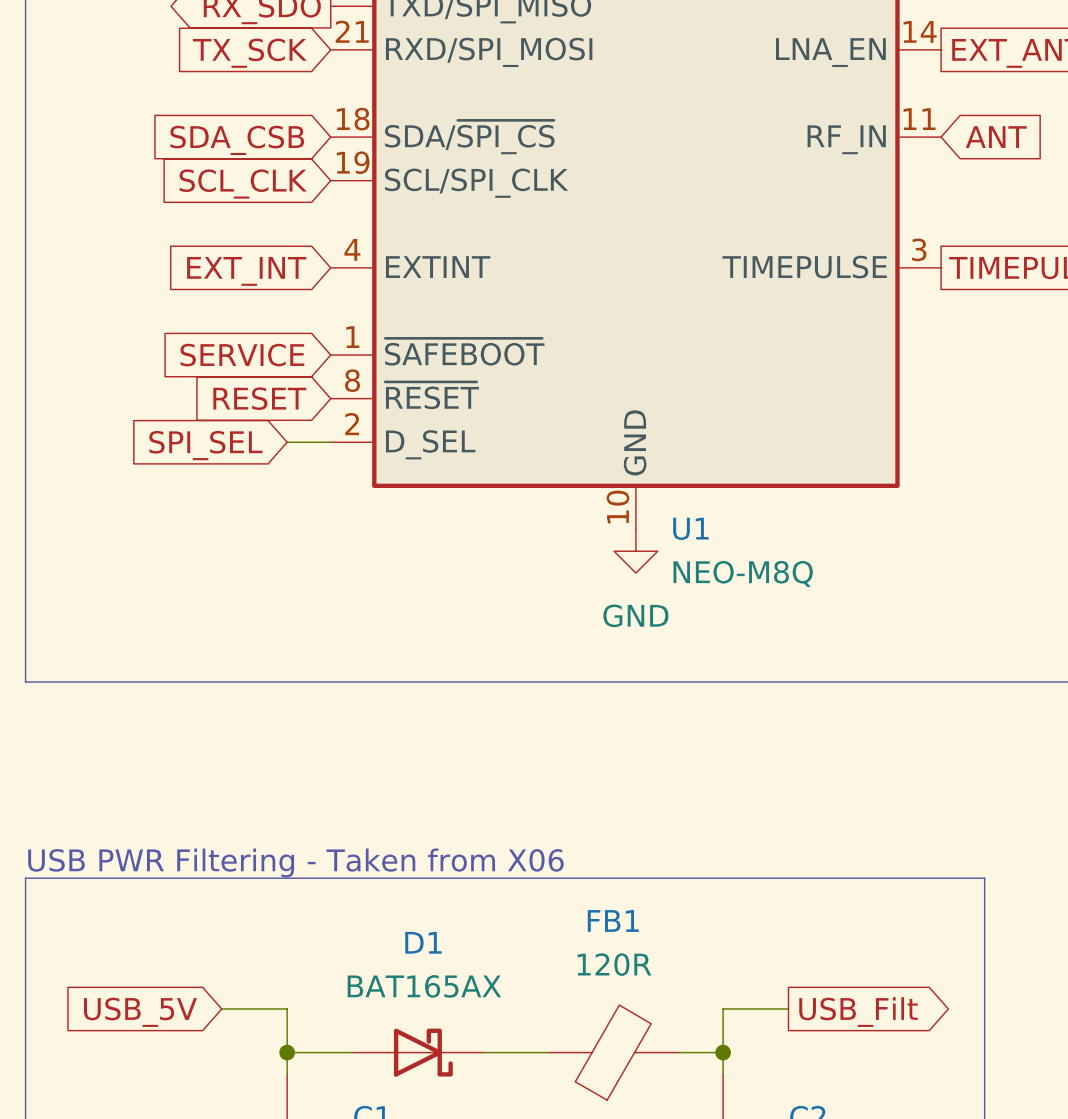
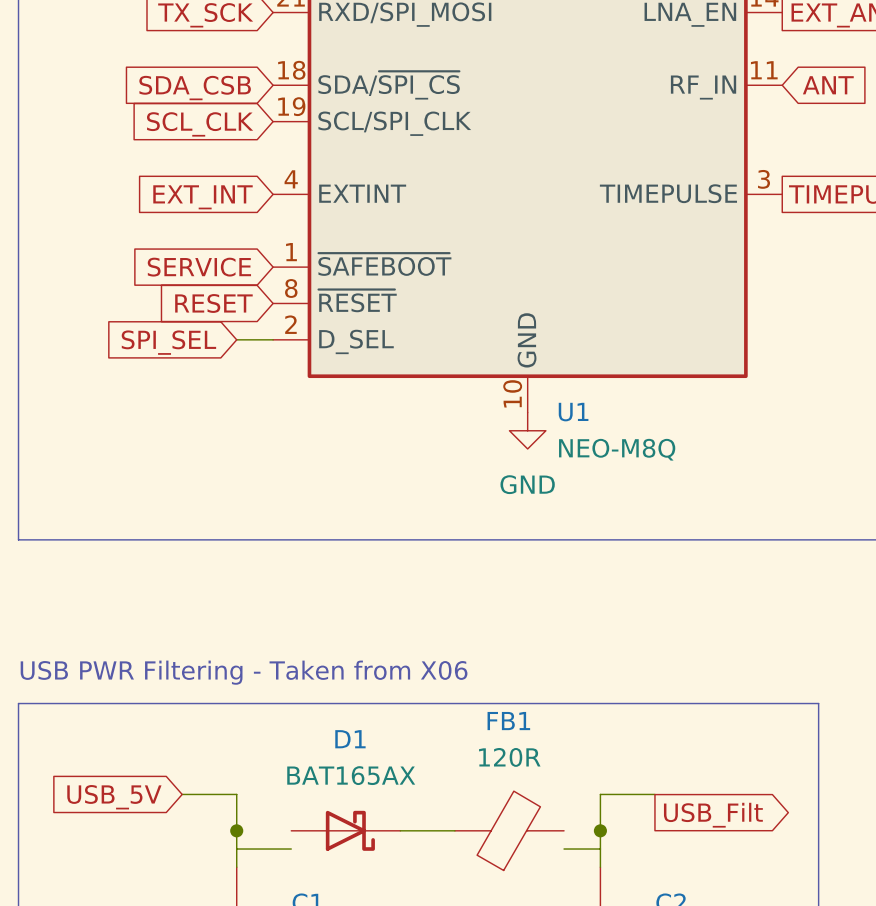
text position: USB PWR Filtering - Taken from X06 (295, 862) -> USB PWR Filtering - Taken from X06 (244, 672)
wire: (221, 1008) (287, 1008) -> (182, 794) (236, 794) (236, 812)
wire: (723, 1008) (788, 1008) -> (600, 812) (600, 794) (654, 794)
global label position: USB_5V (140, 1012) -> USB_5V (114, 797)
junction position: (287, 1052) -> (236, 830)
D1 position: (417, 1052) -> (345, 830)
wire: (483, 1052) (548, 1052) -> (400, 830) (454, 830)
FB1 position: (614, 1052) -> (509, 830)
junction position: (723, 1052) -> (600, 830)

